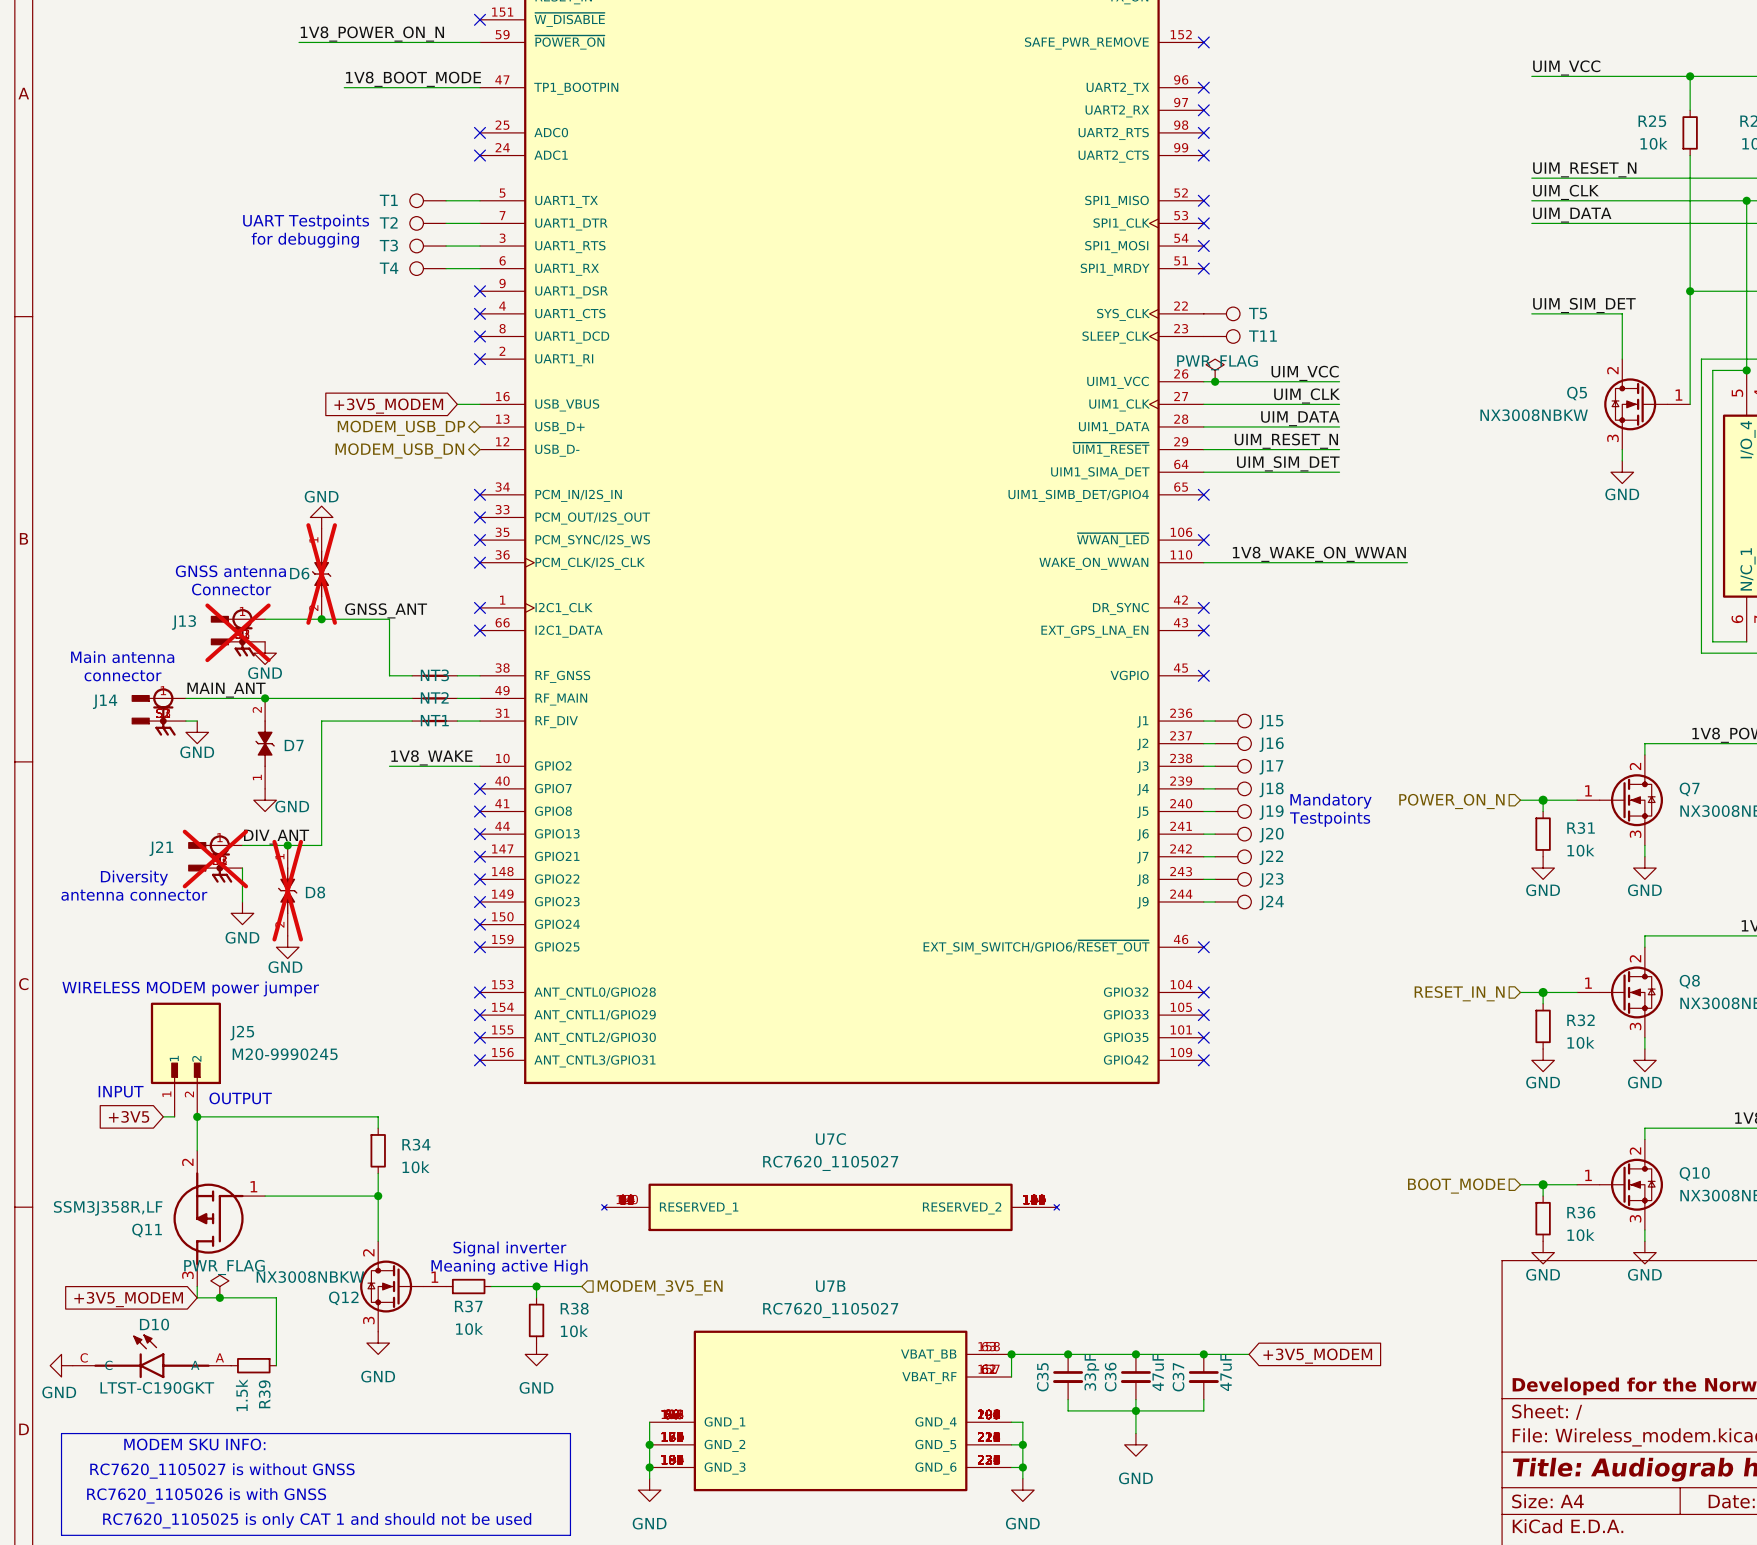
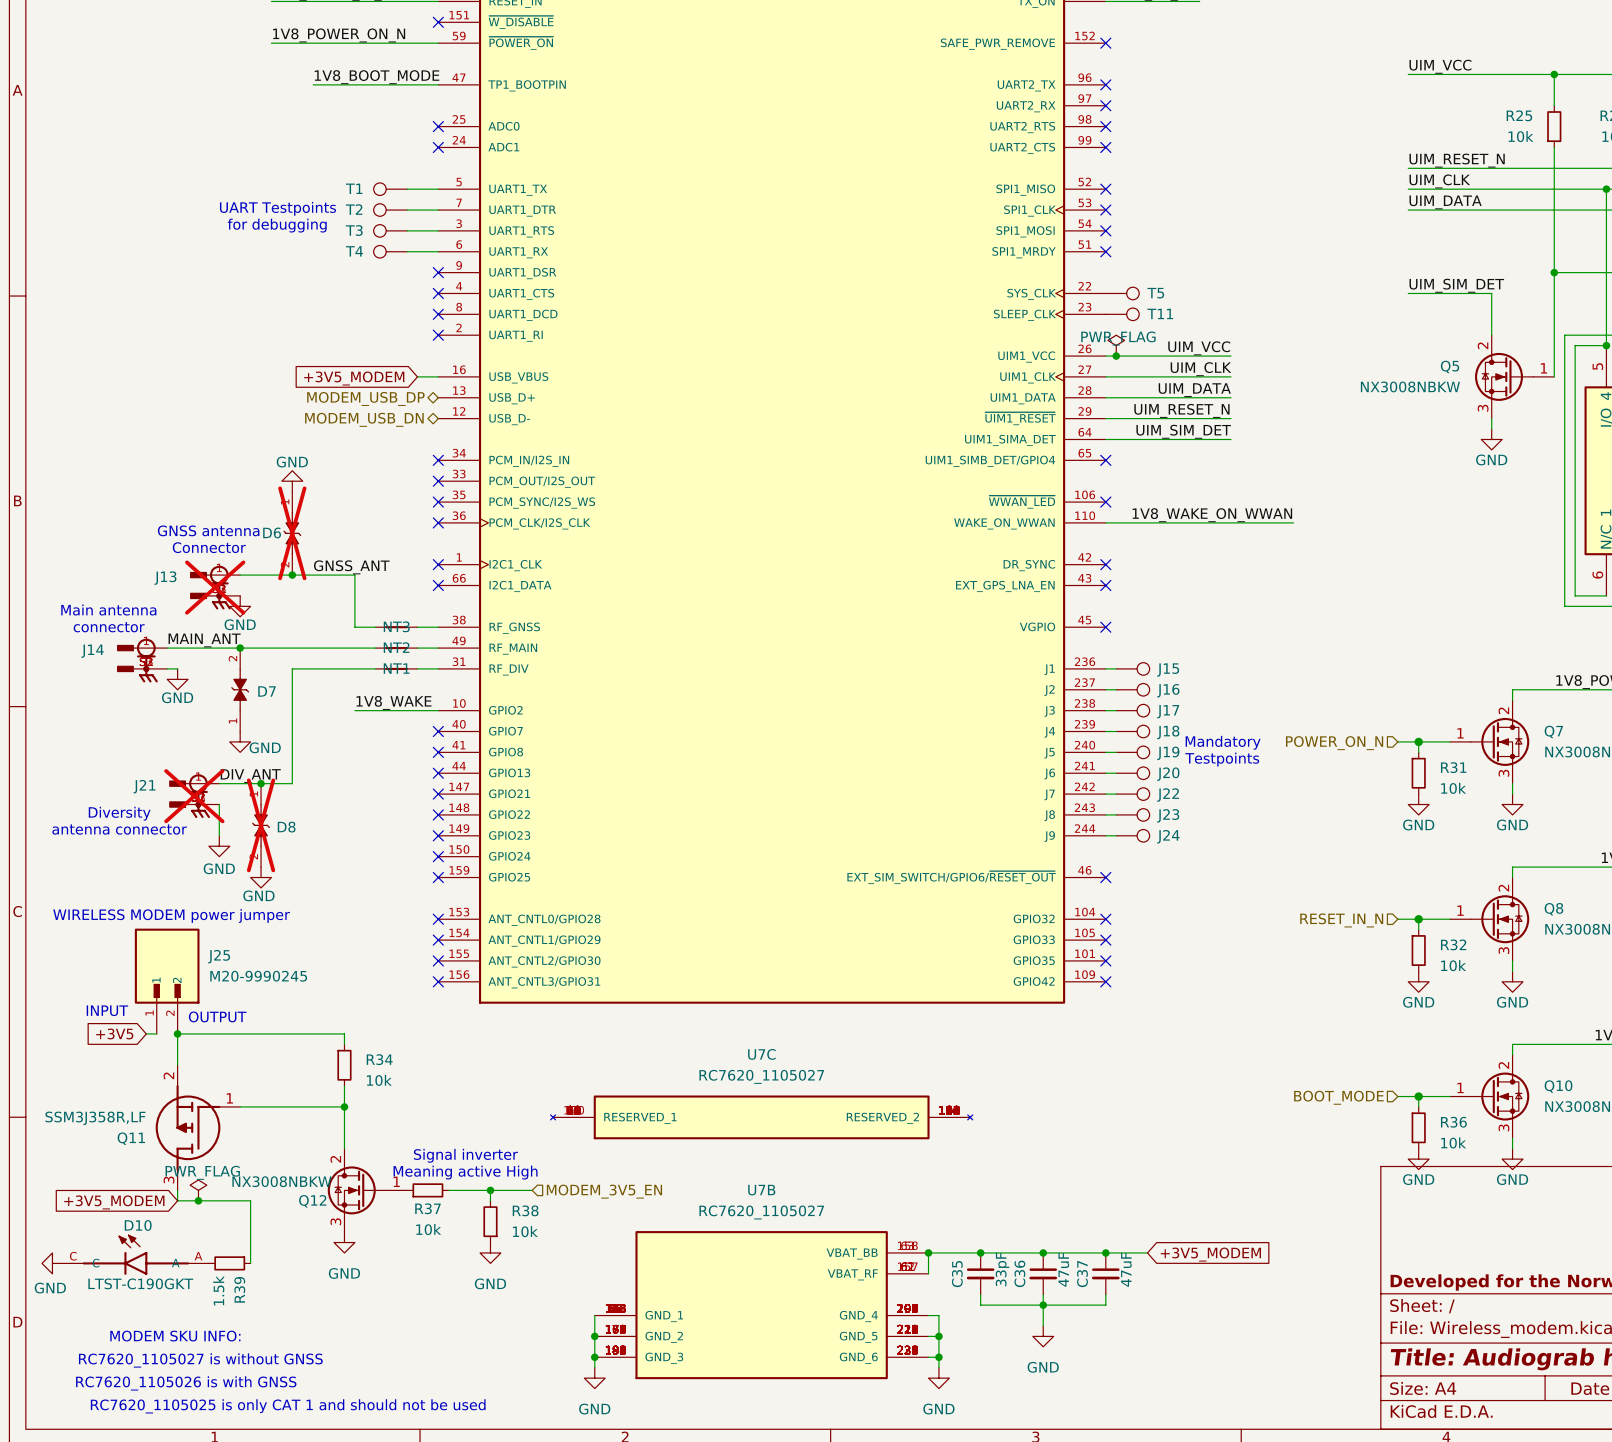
line: (61, 1433) (570, 1433) (570, 1535) (61, 1535) (61, 1433) -> none

